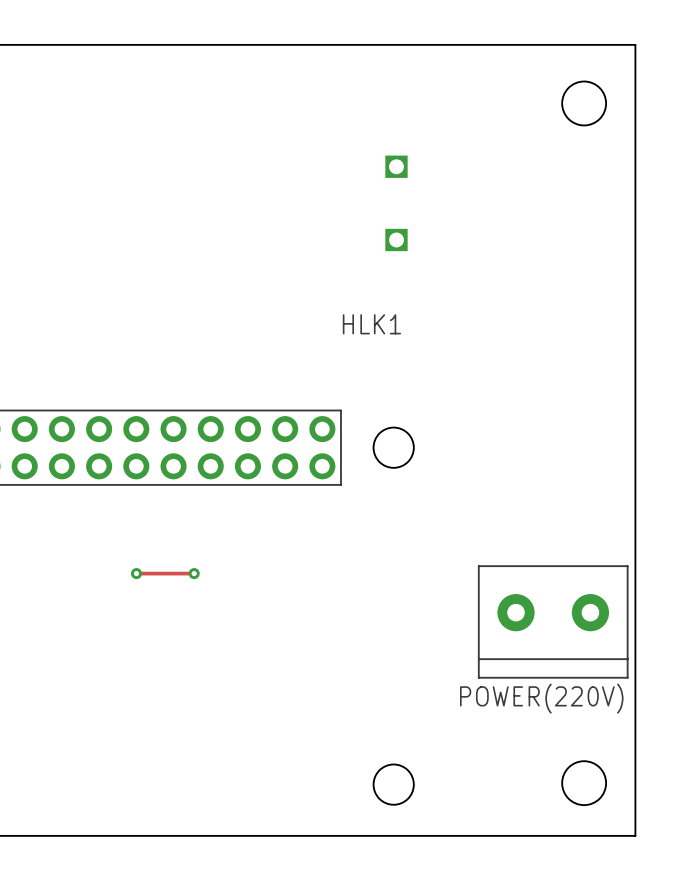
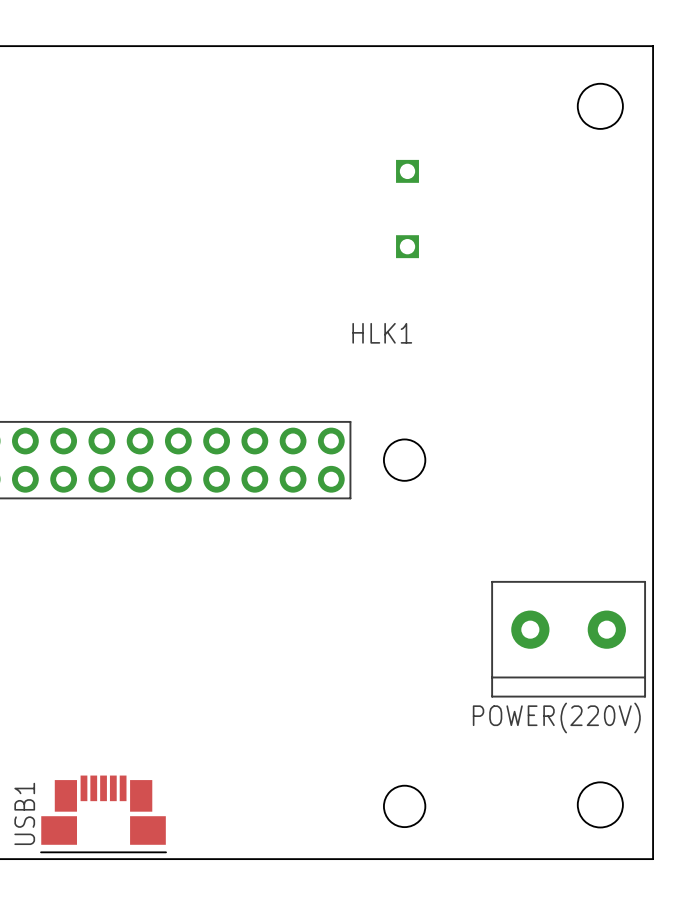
track: (136, 573) (194, 573) -> none
via: (136, 573) -> none
via: (194, 573) -> none
USB1: none -> (103, 813)

